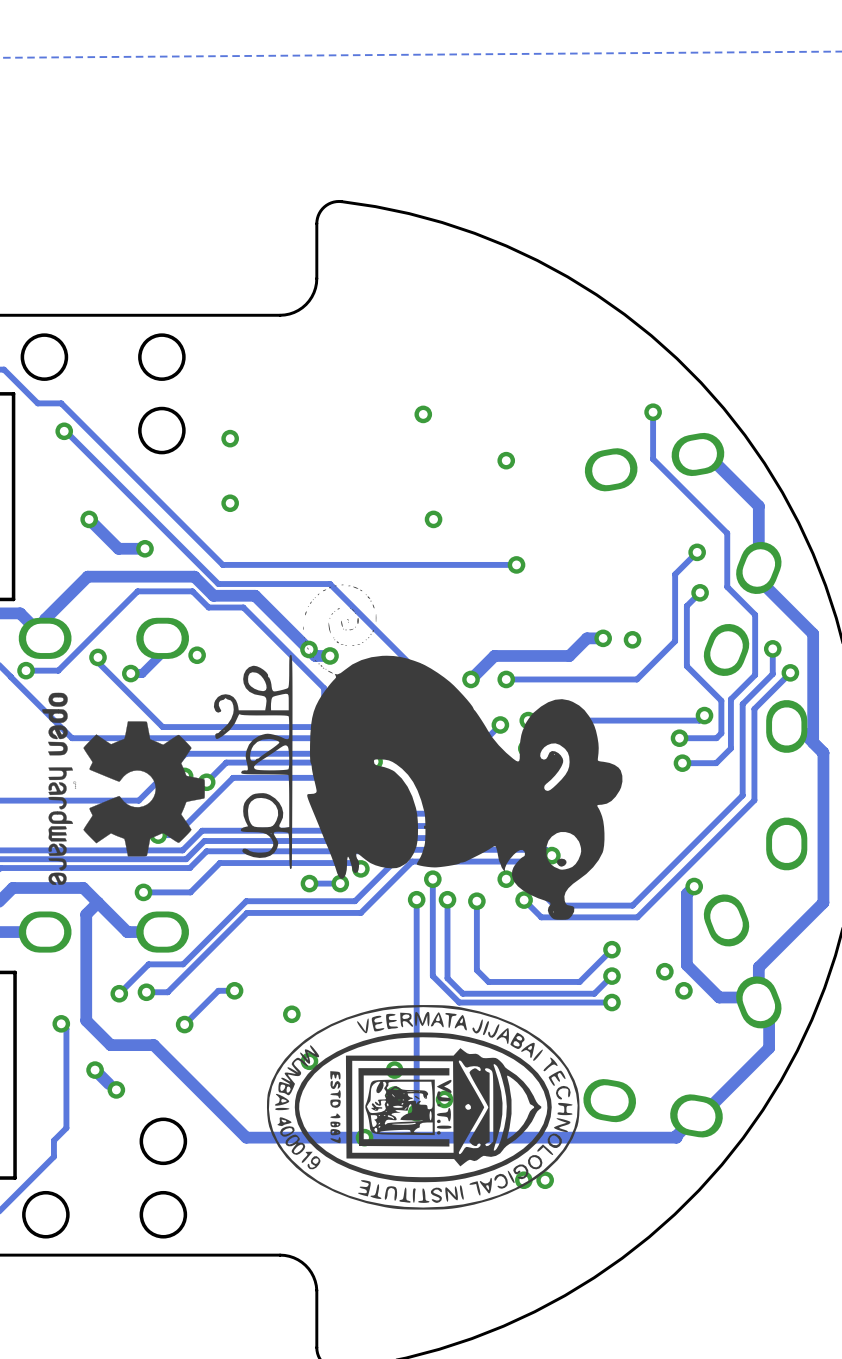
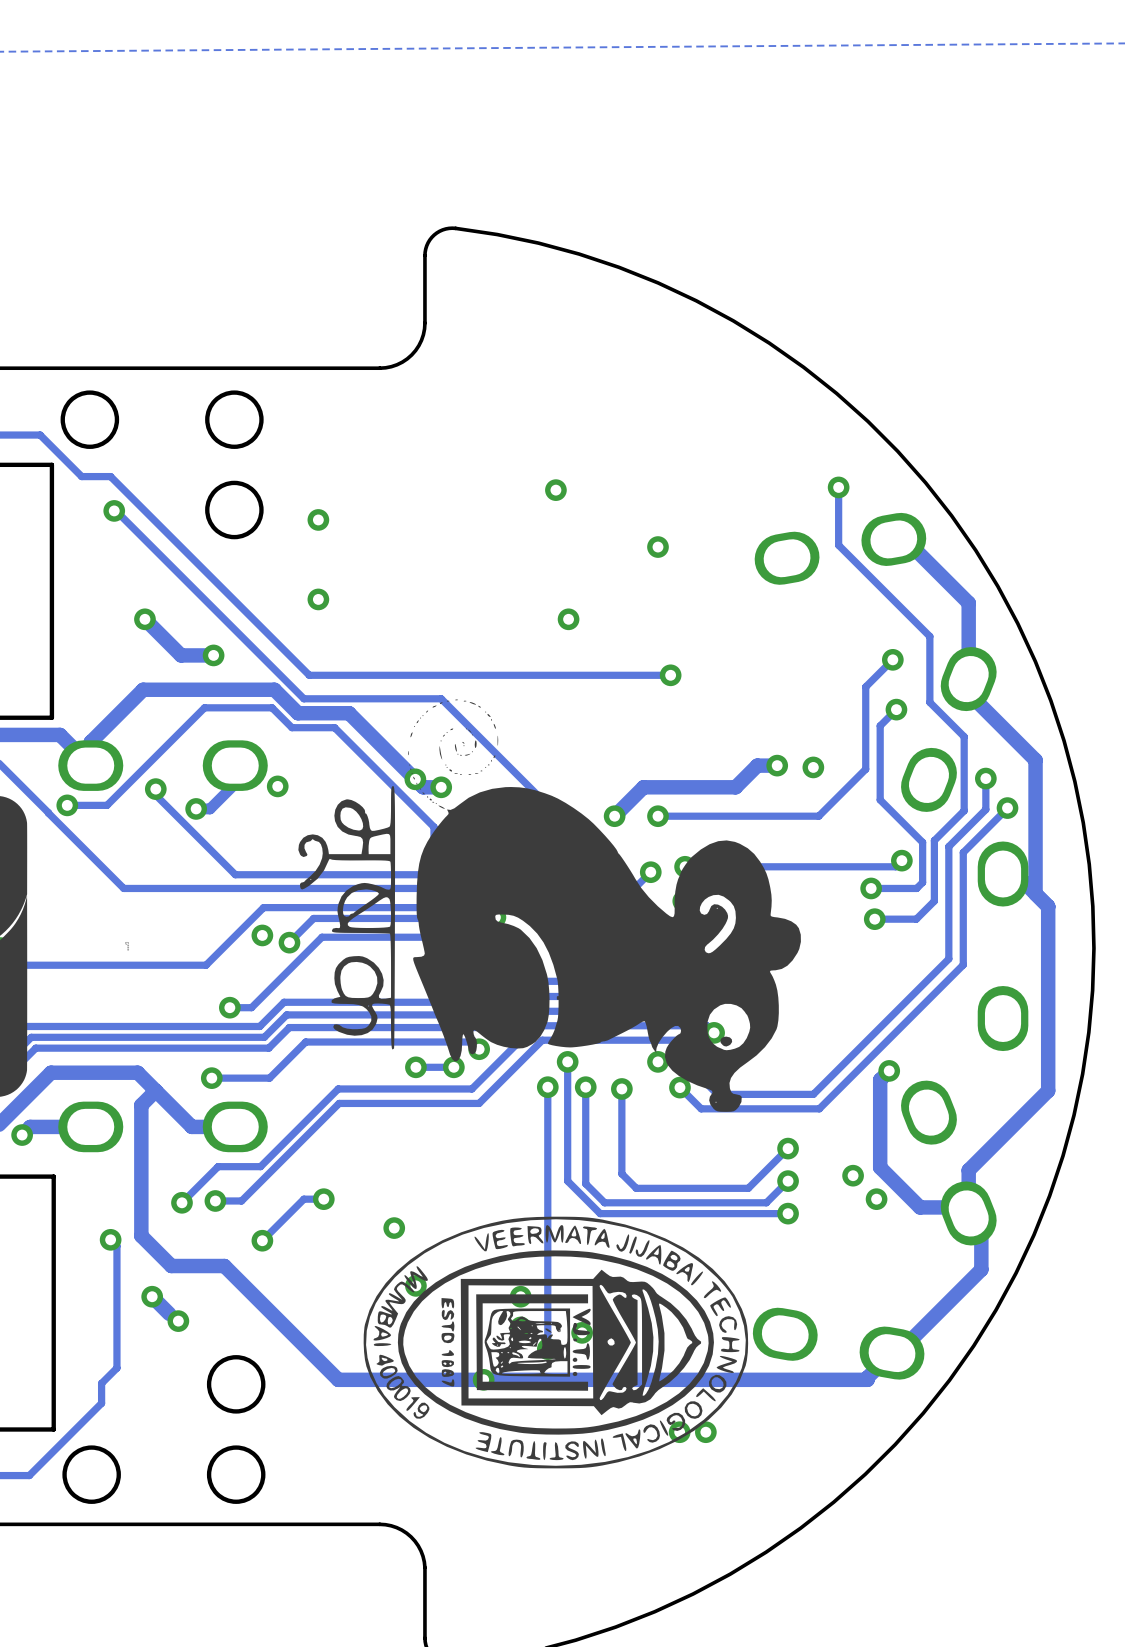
drawing: [42, 692, 205, 885] -> none

